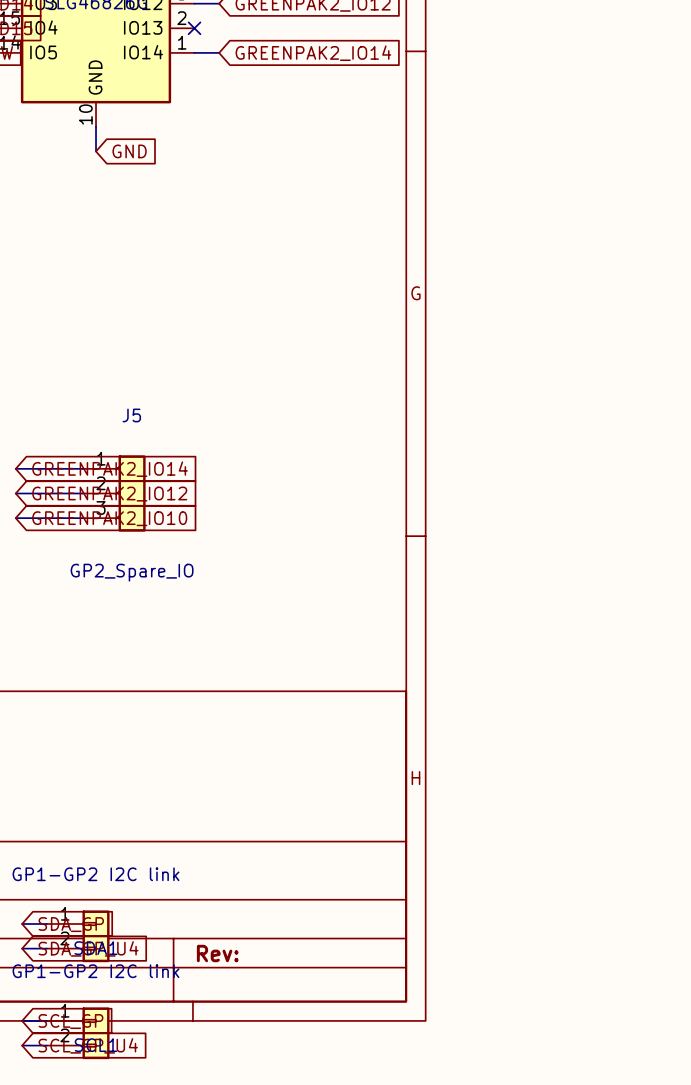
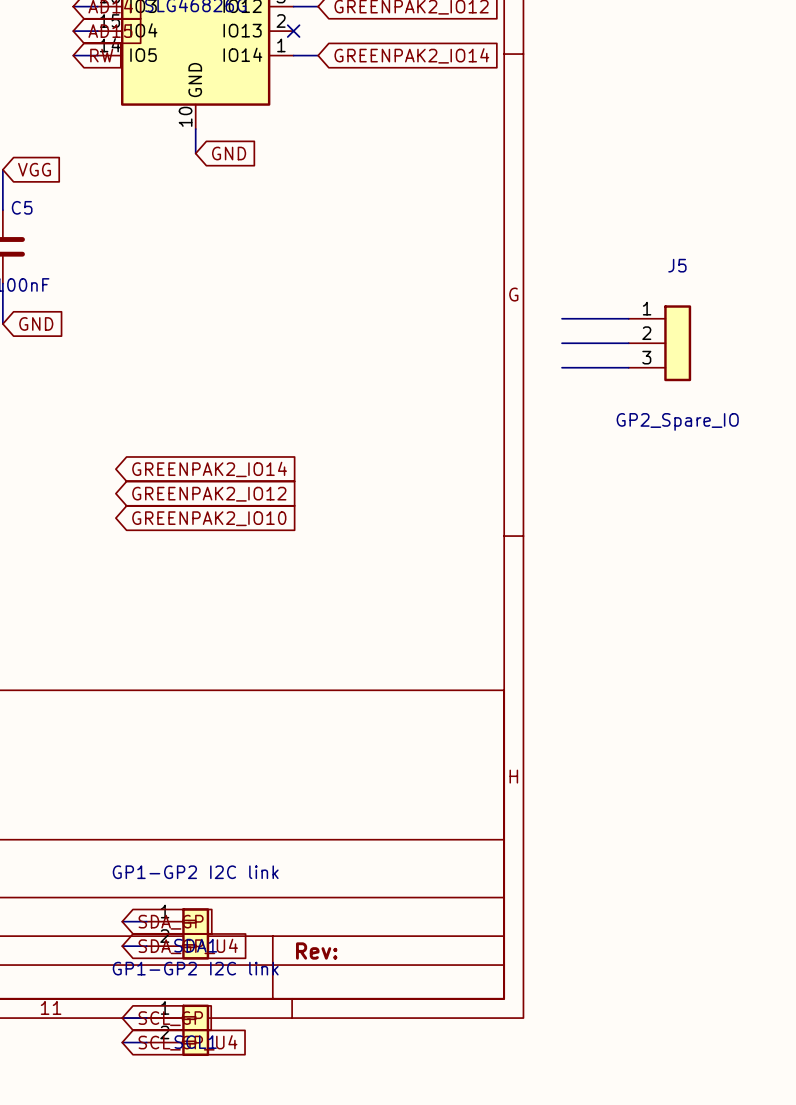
wire: none -> (562, 318) (628, 318)
wire: none -> (562, 343) (628, 343)
wire: none -> (562, 367) (628, 367)
wire: (15, 468) (82, 468) -> none
wire: (15, 493) (82, 493) -> none
J5 position: (114, 493) -> (659, 343)
wire: (15, 518) (82, 518) -> none

